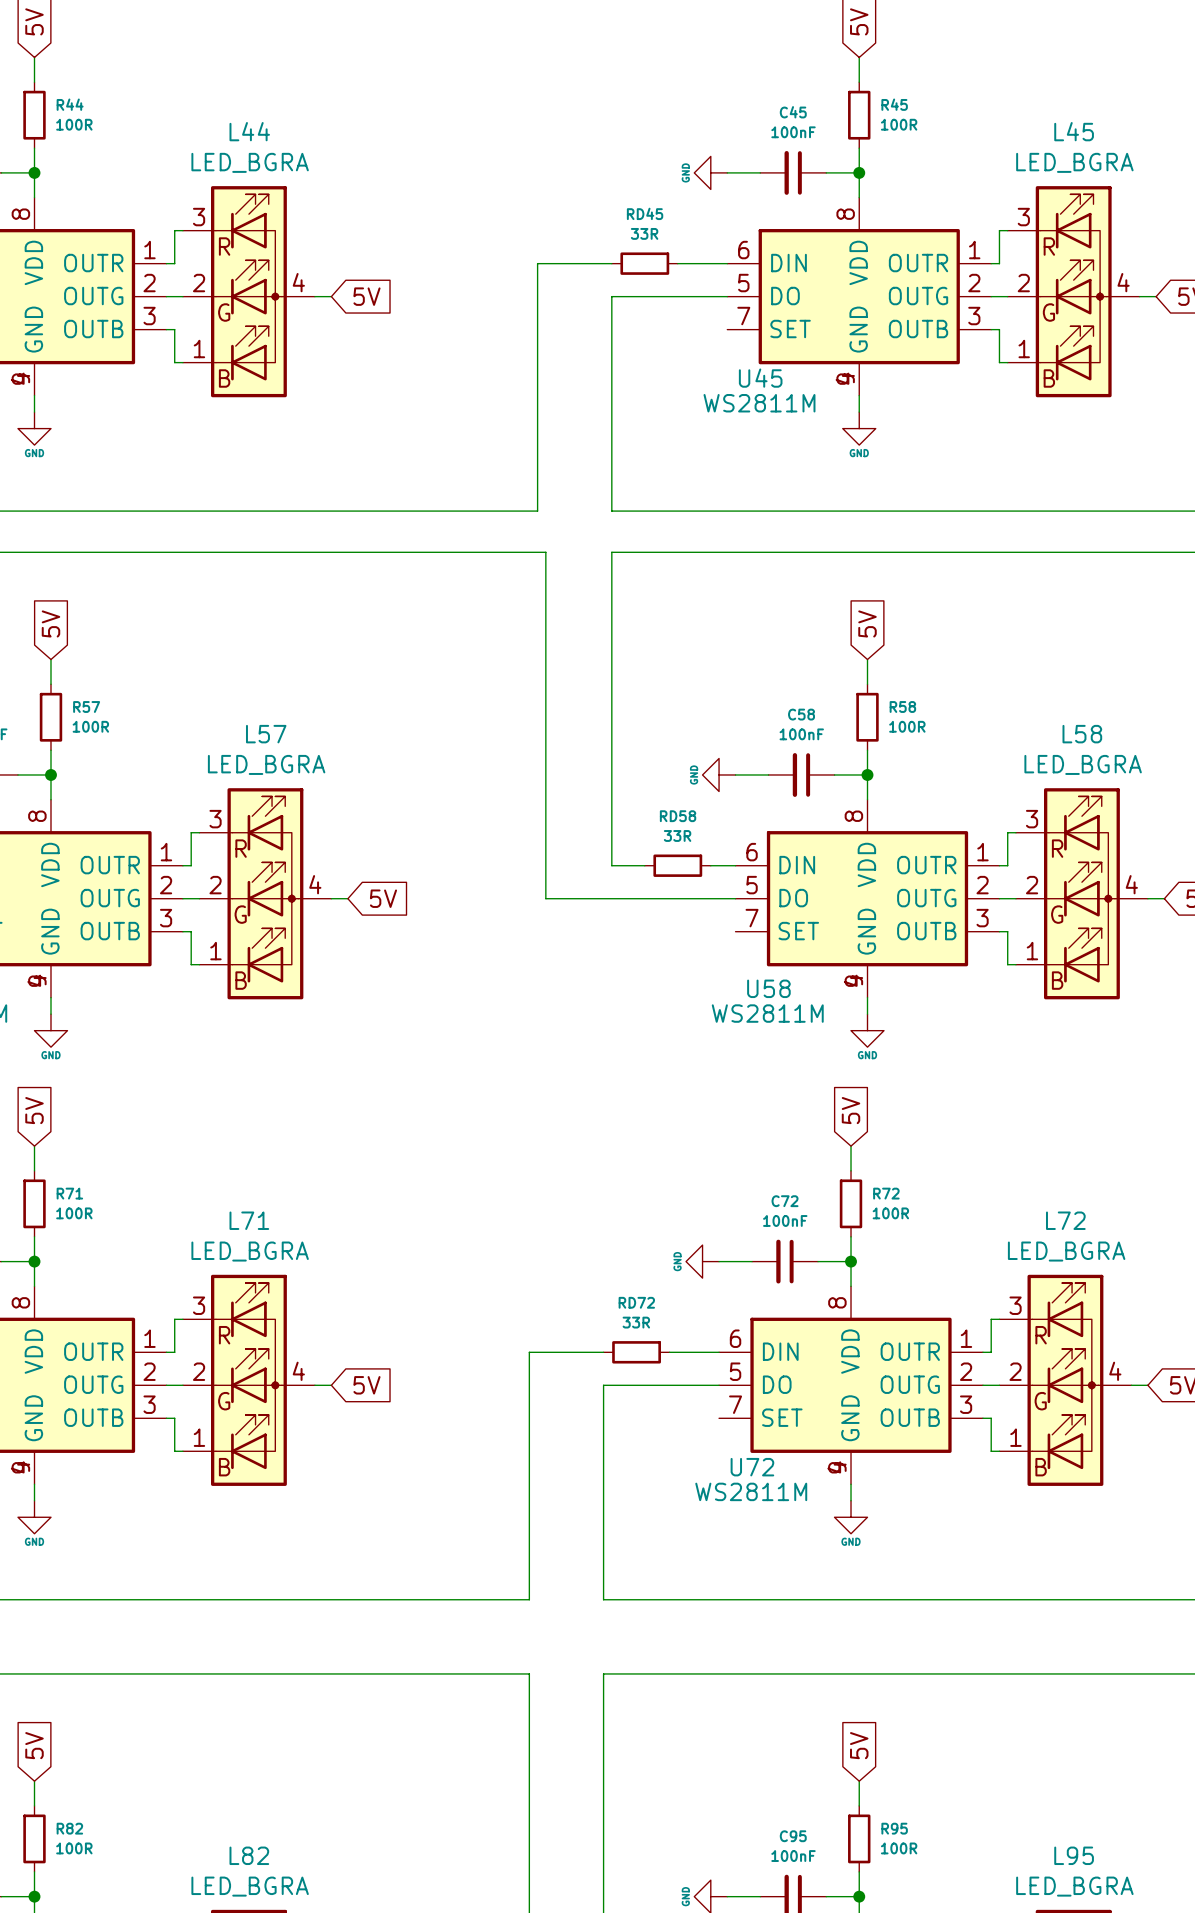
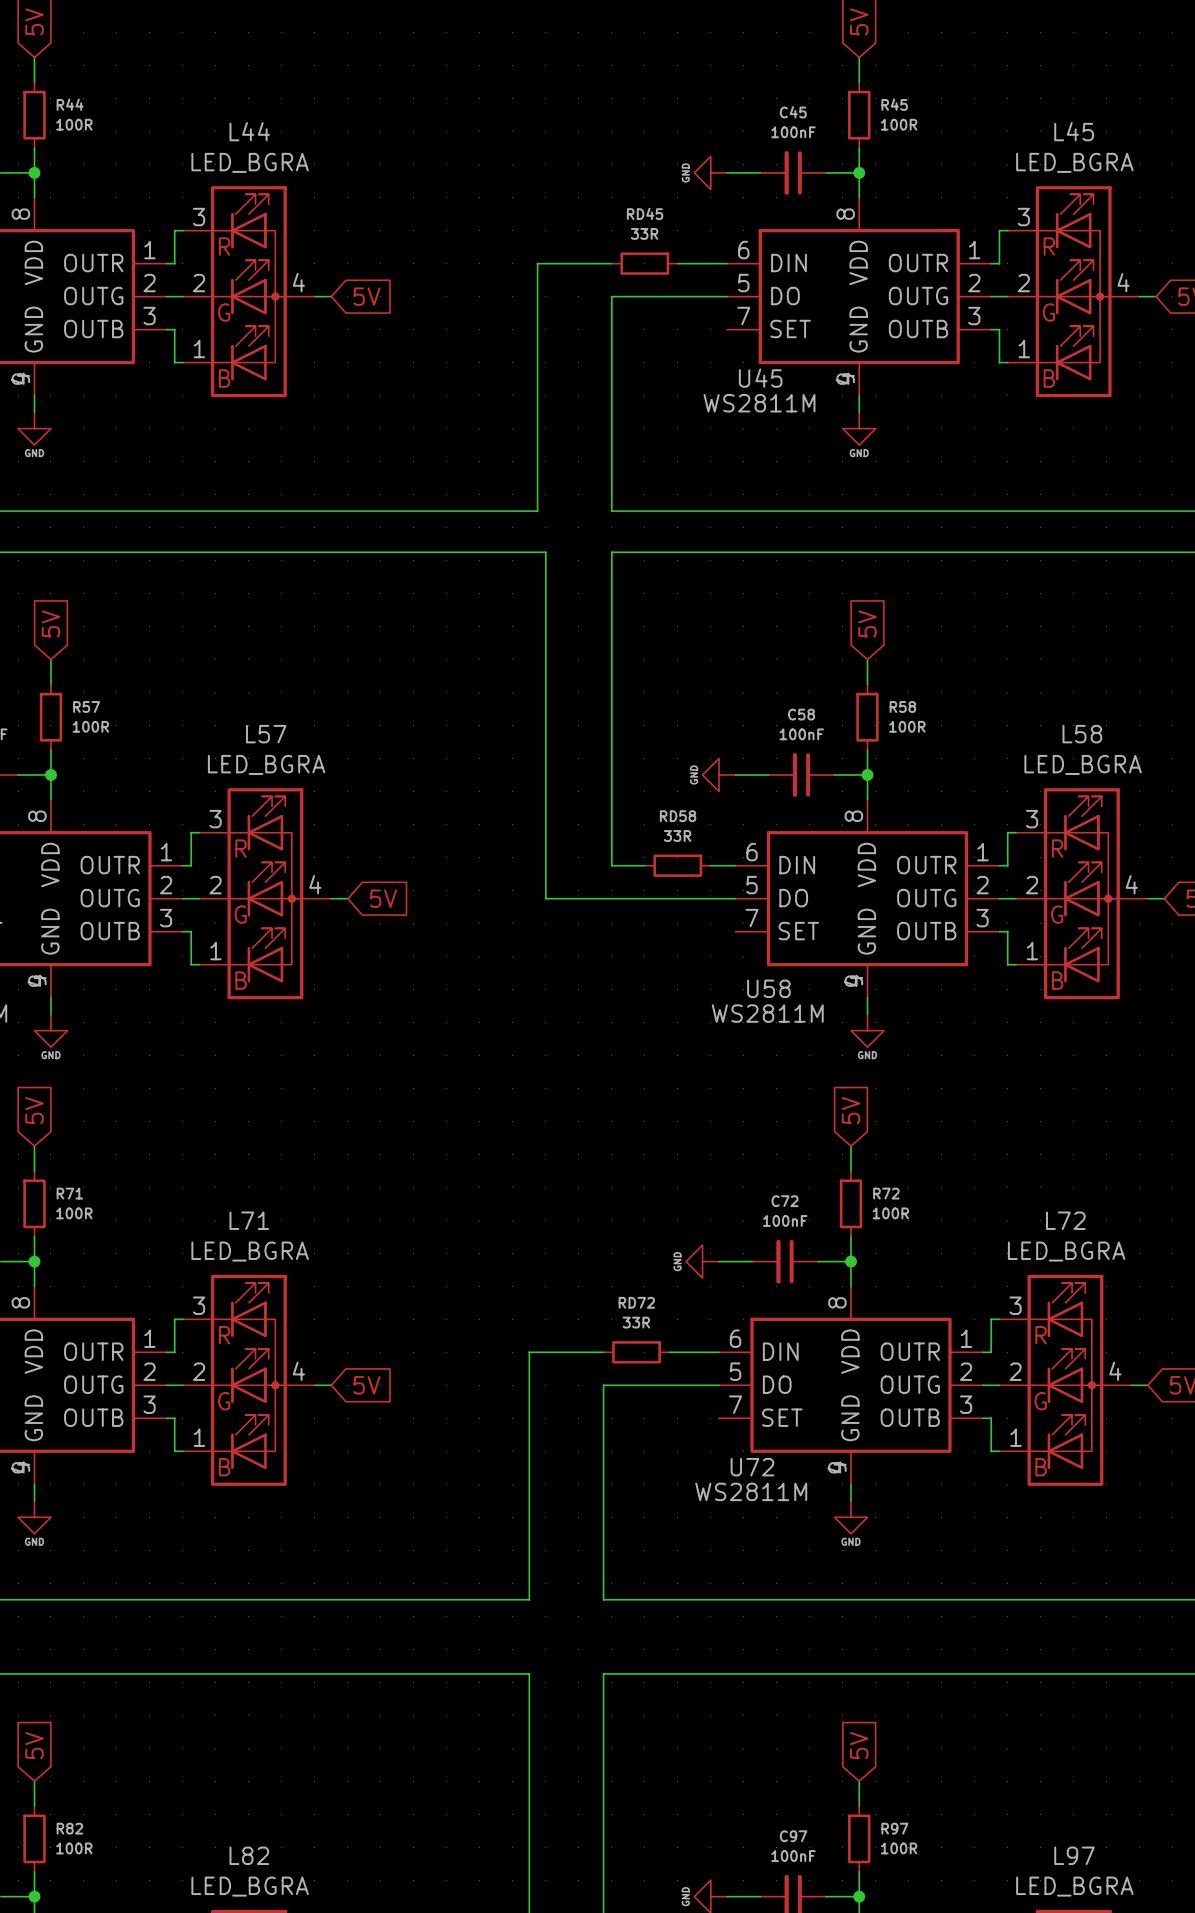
R95 name: R95 (894, 1828) -> R97 (894, 1828)
C95 name: C95 (793, 1836) -> C97 (793, 1836)
L95 name: L95 (1074, 1855) -> L97 (1074, 1855)

